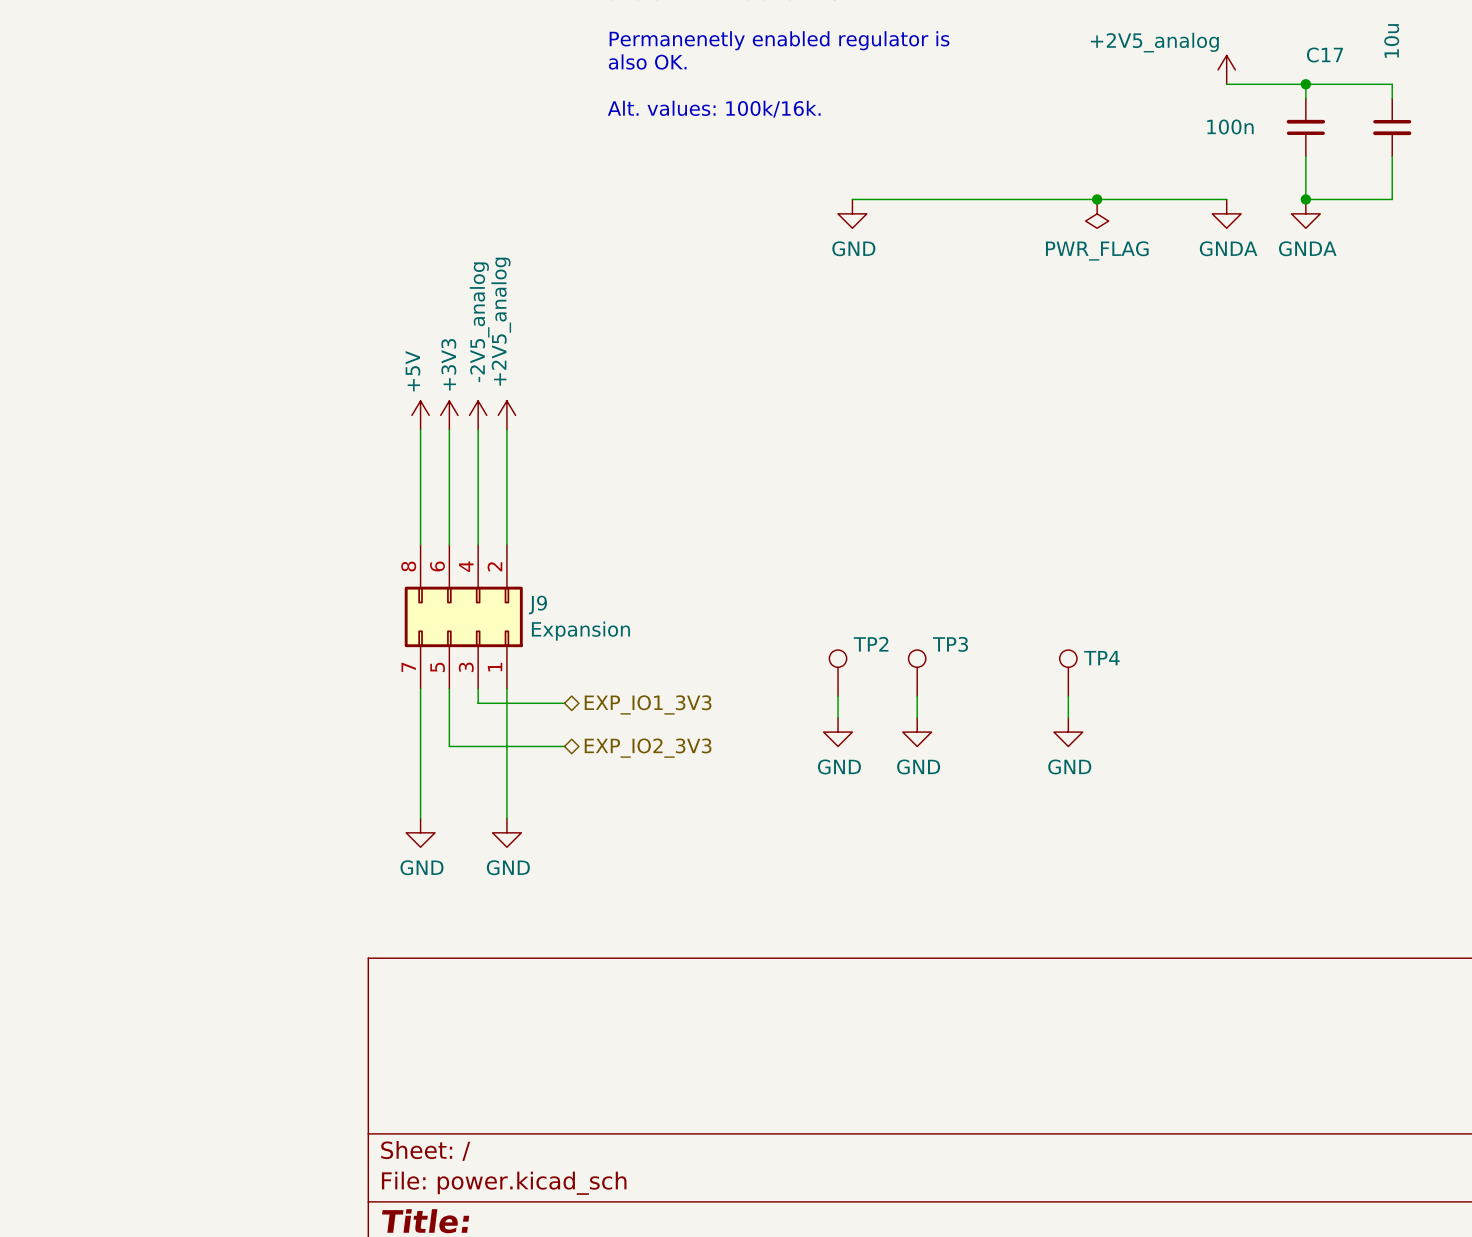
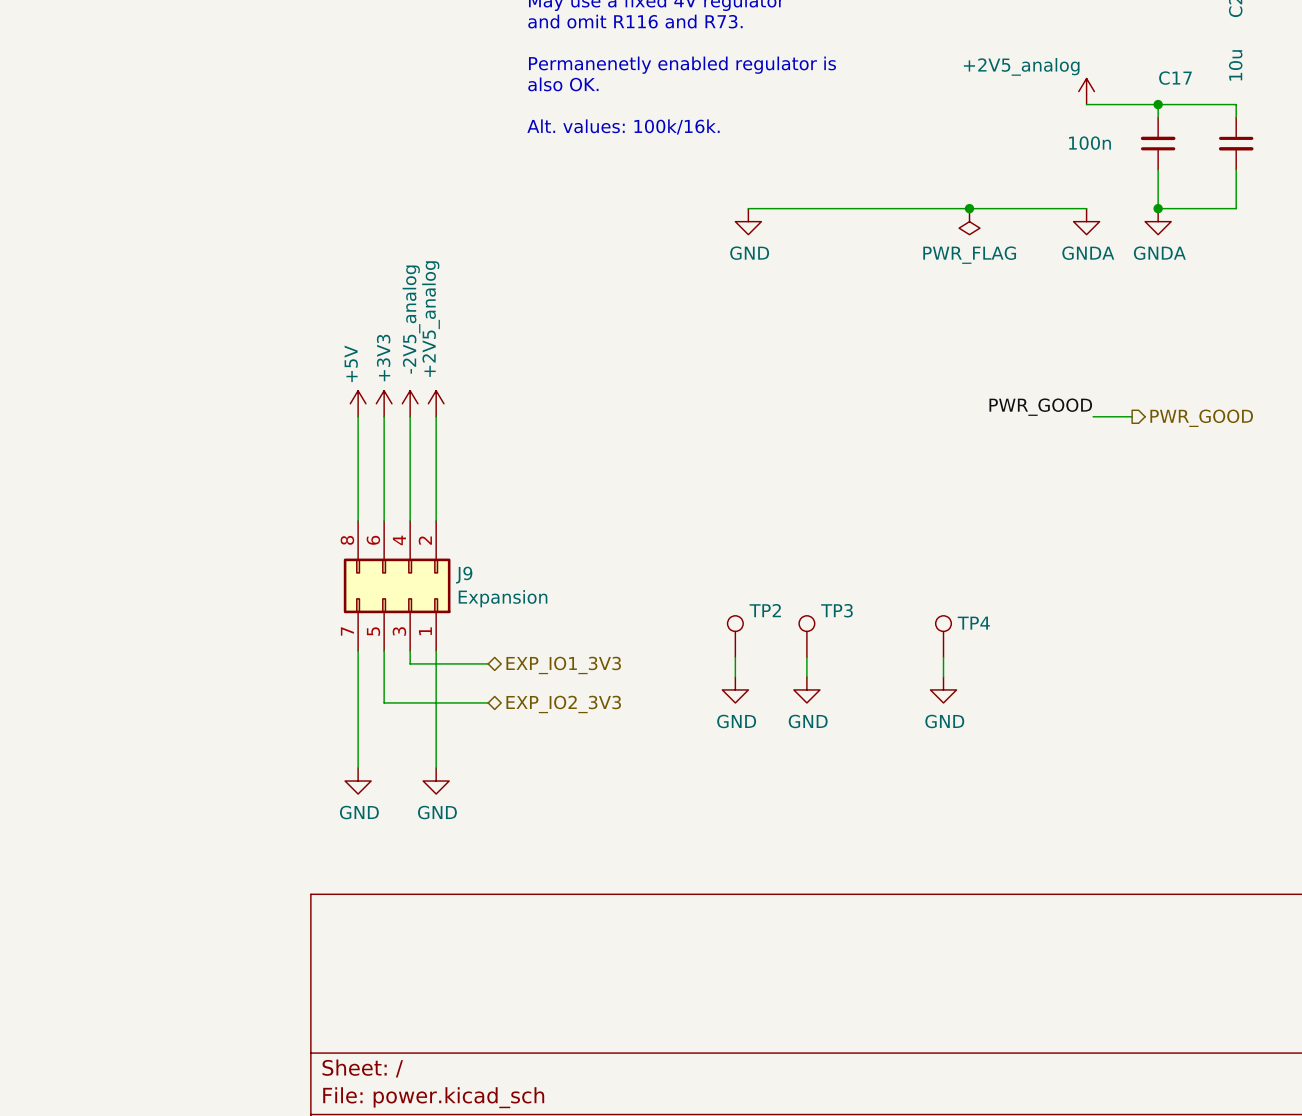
label: none -> PWR_GOOD (1040, 407)
wire: none -> (1093, 416) (1132, 416)
hierarchical label: none -> PWR_GOOD (1201, 418)

